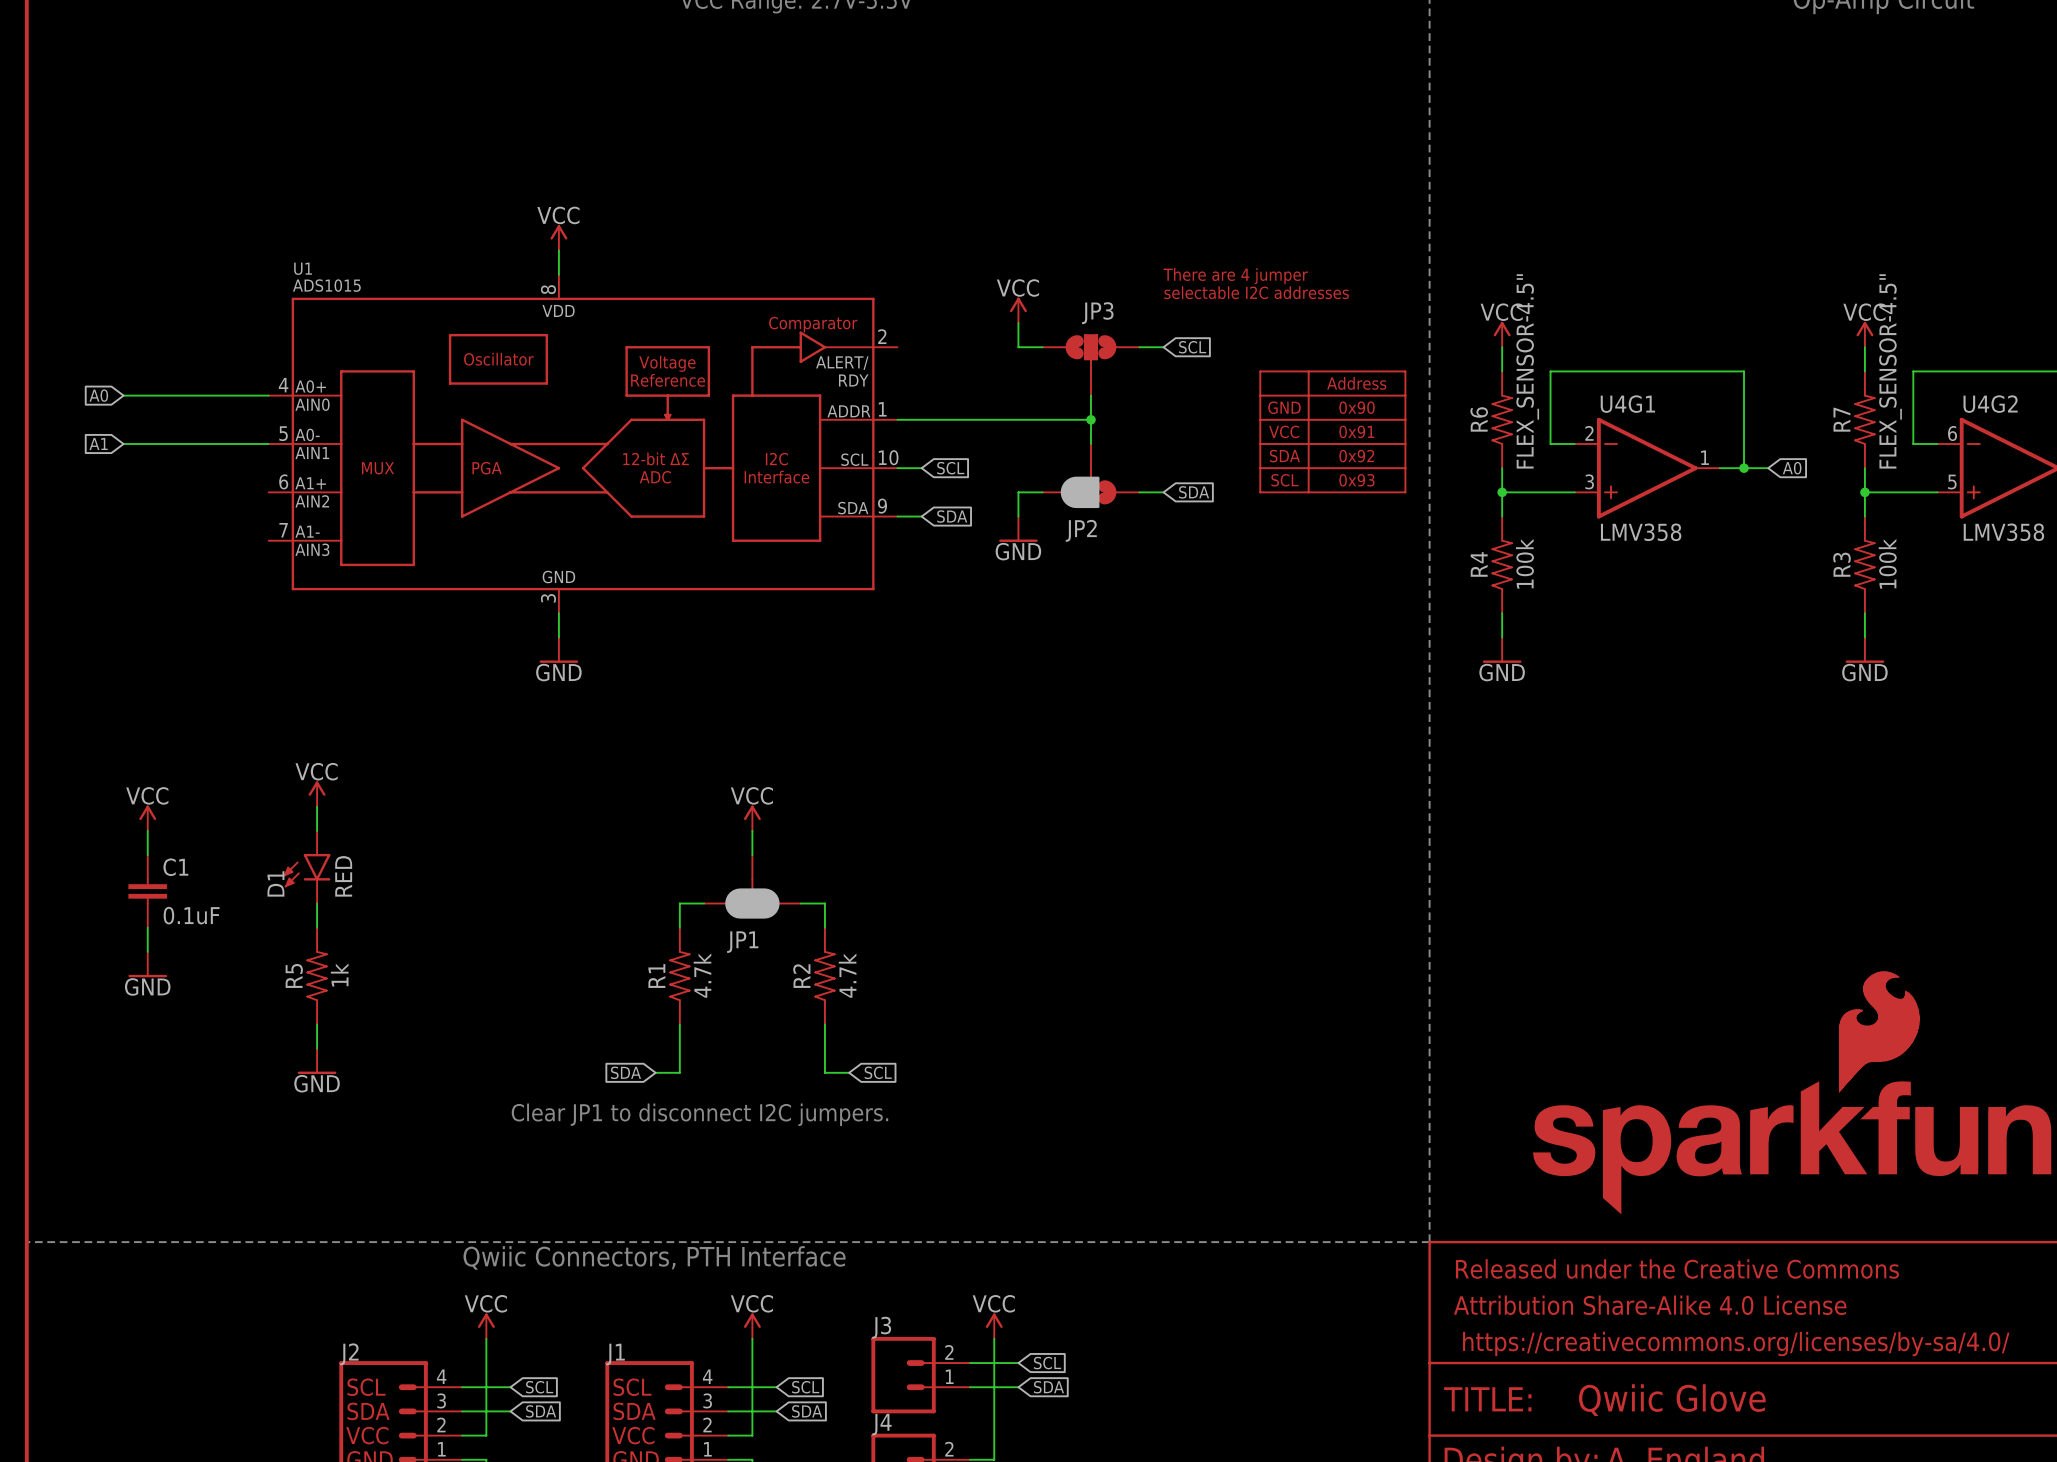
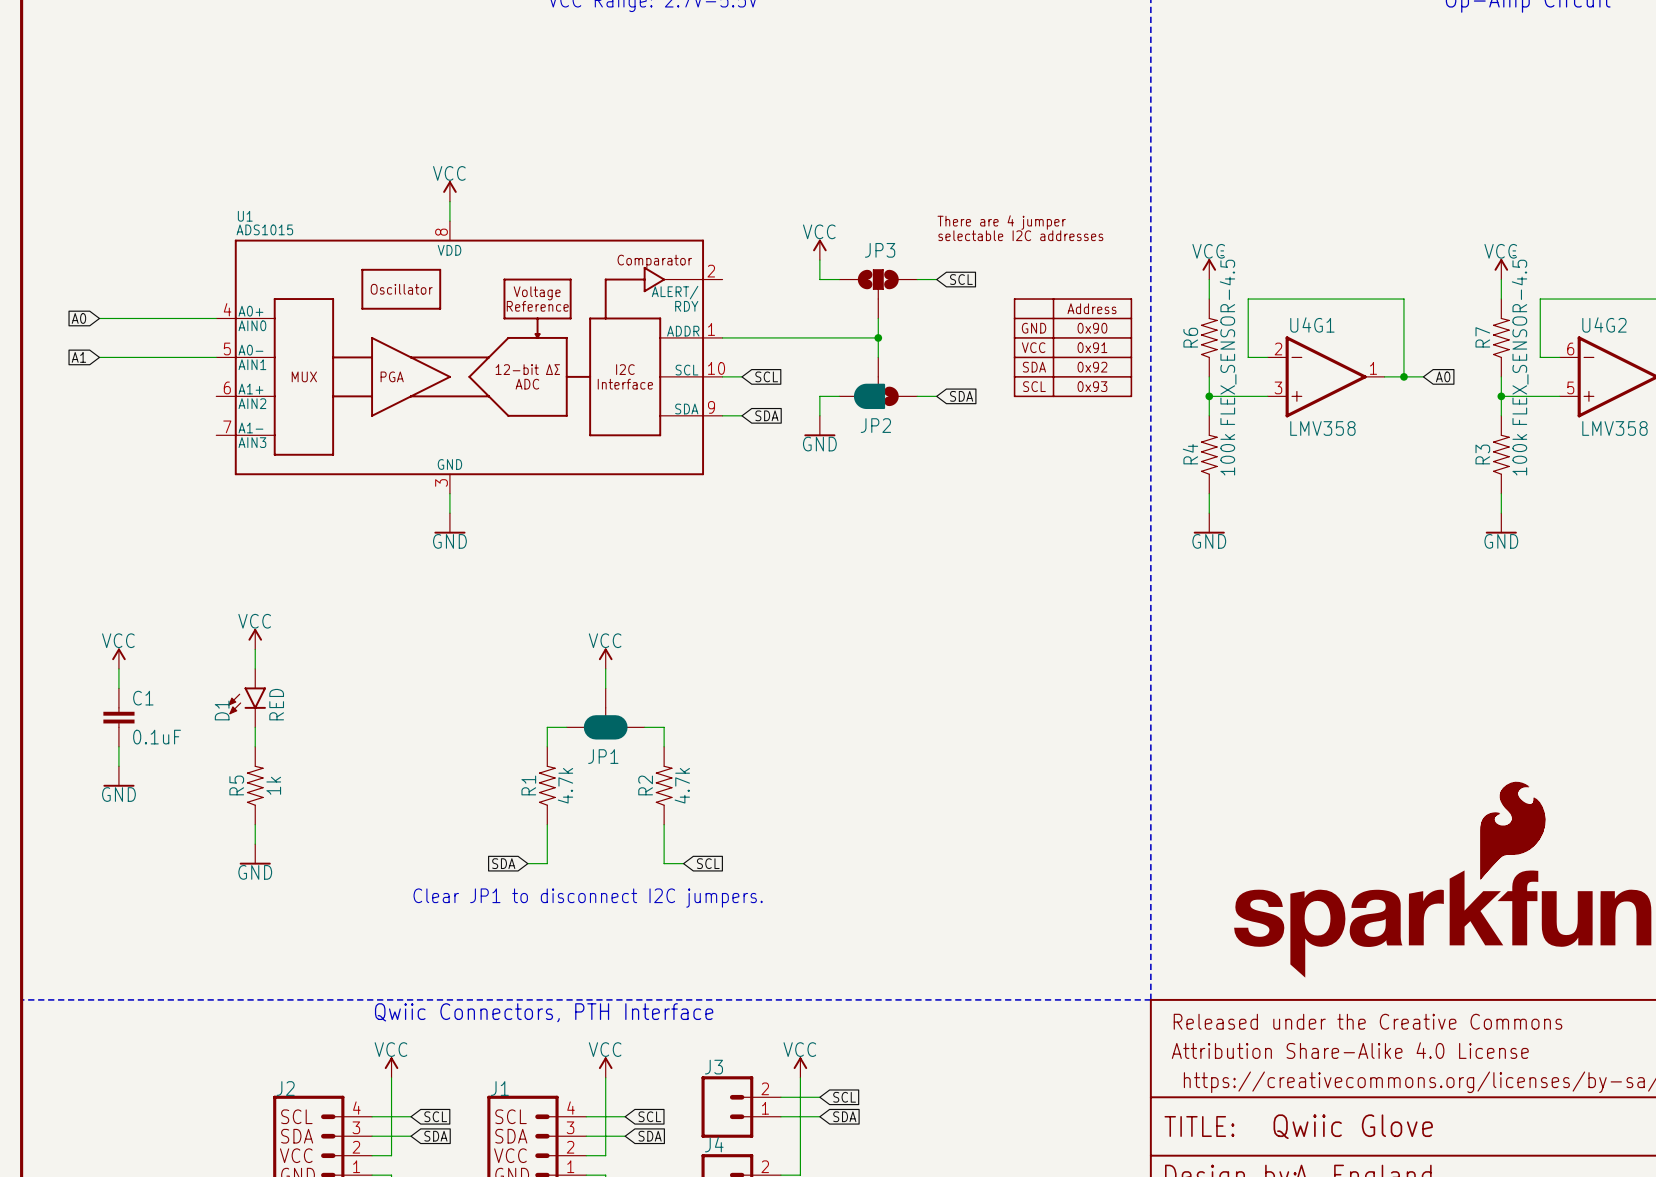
R6 value position: FLEX_SENSOR-4.5" (1527, 371) -> FLEX_SENSOR-4.5" (1228, 337)
R7 value position: FLEX_SENSOR-4.5" (1890, 371) -> FLEX_SENSOR-4.5" (1520, 337)

